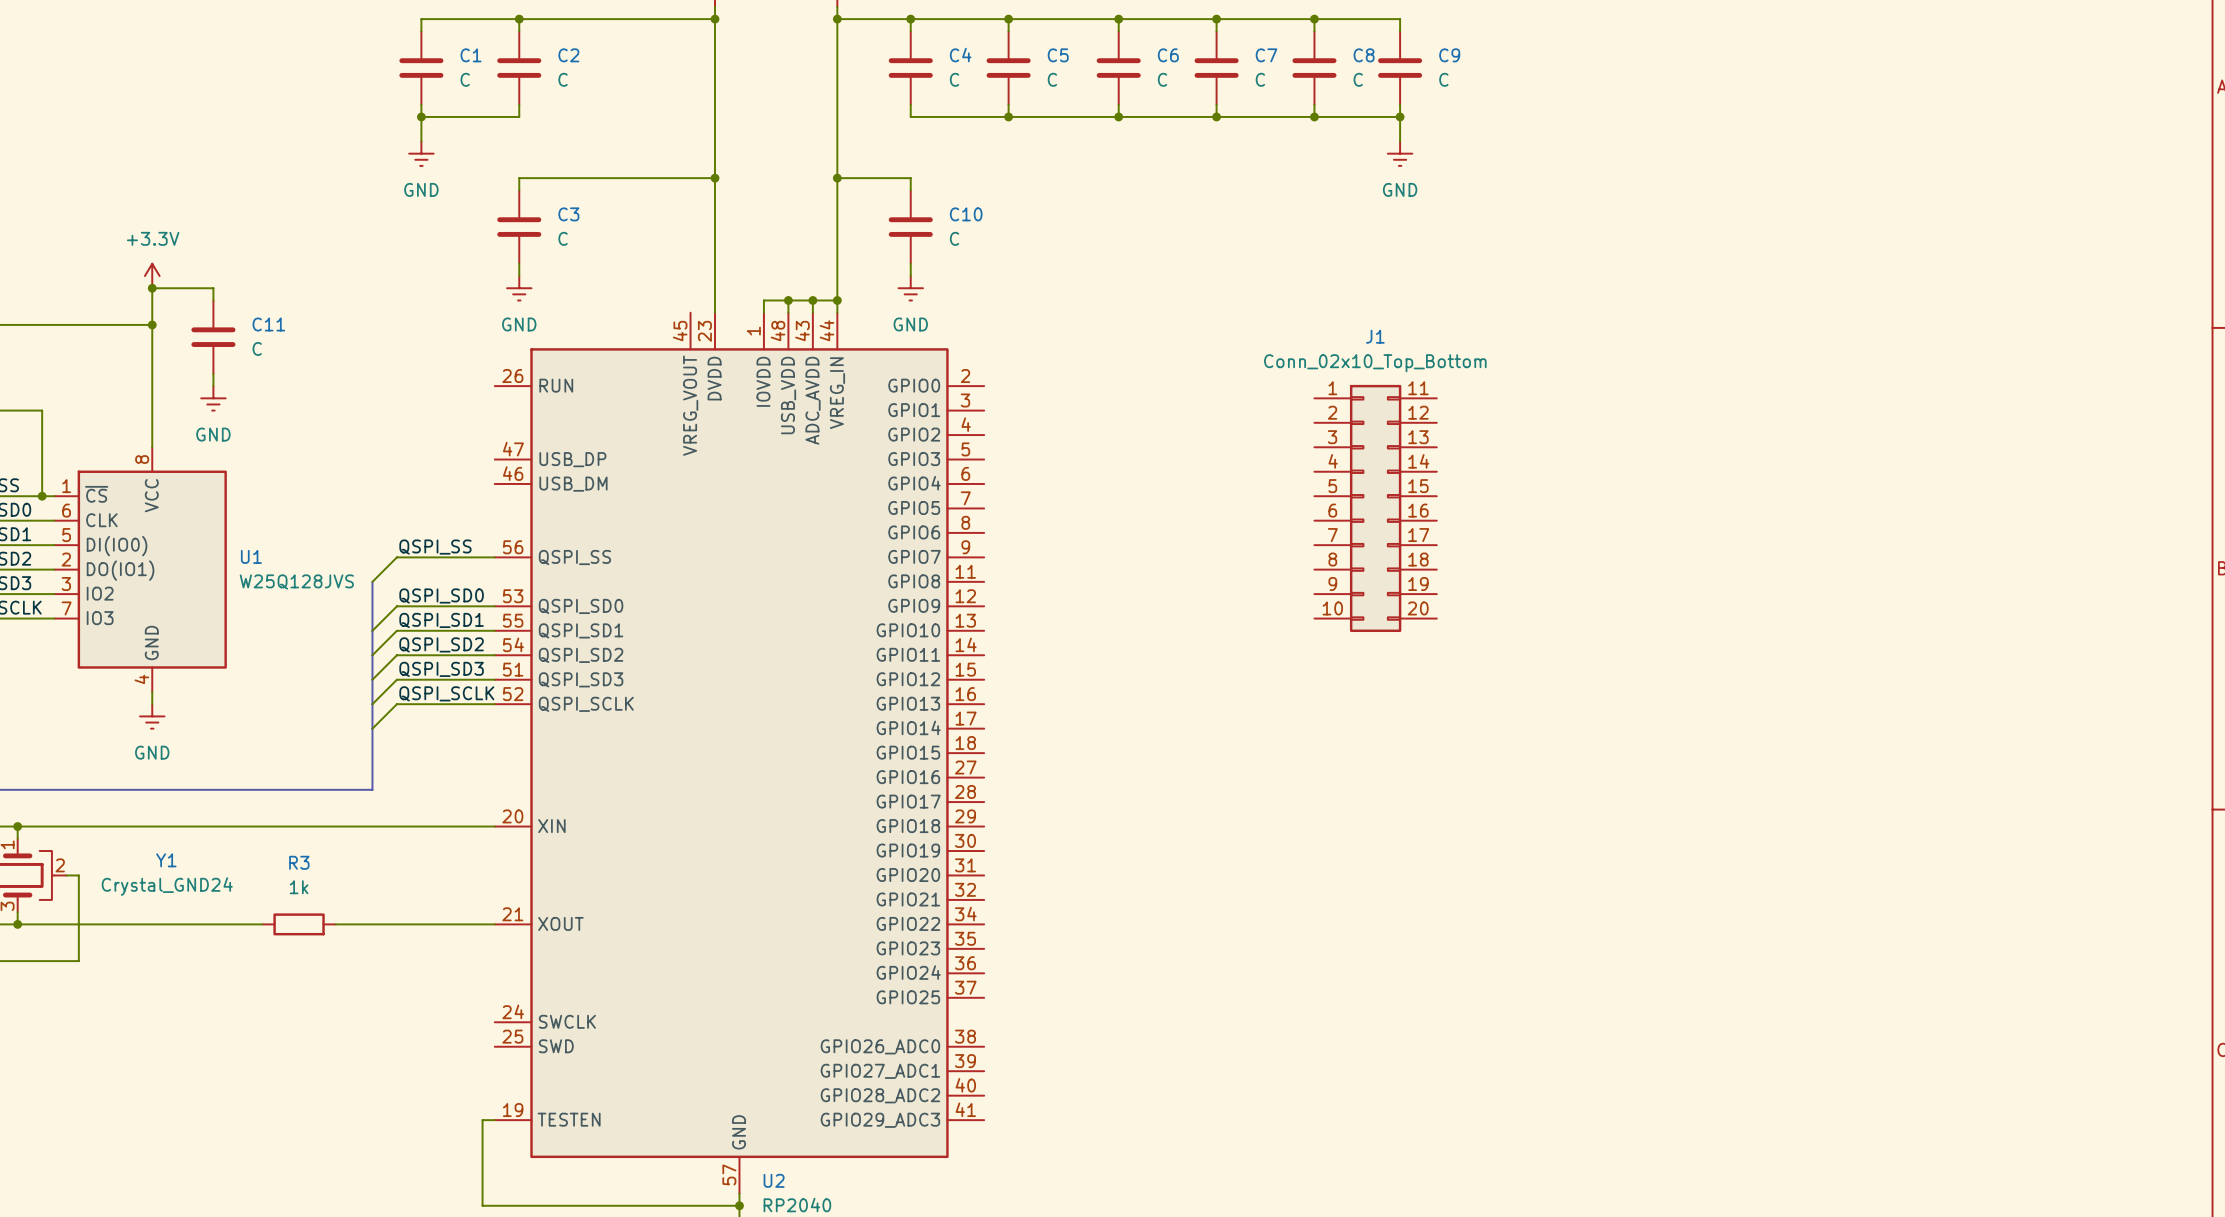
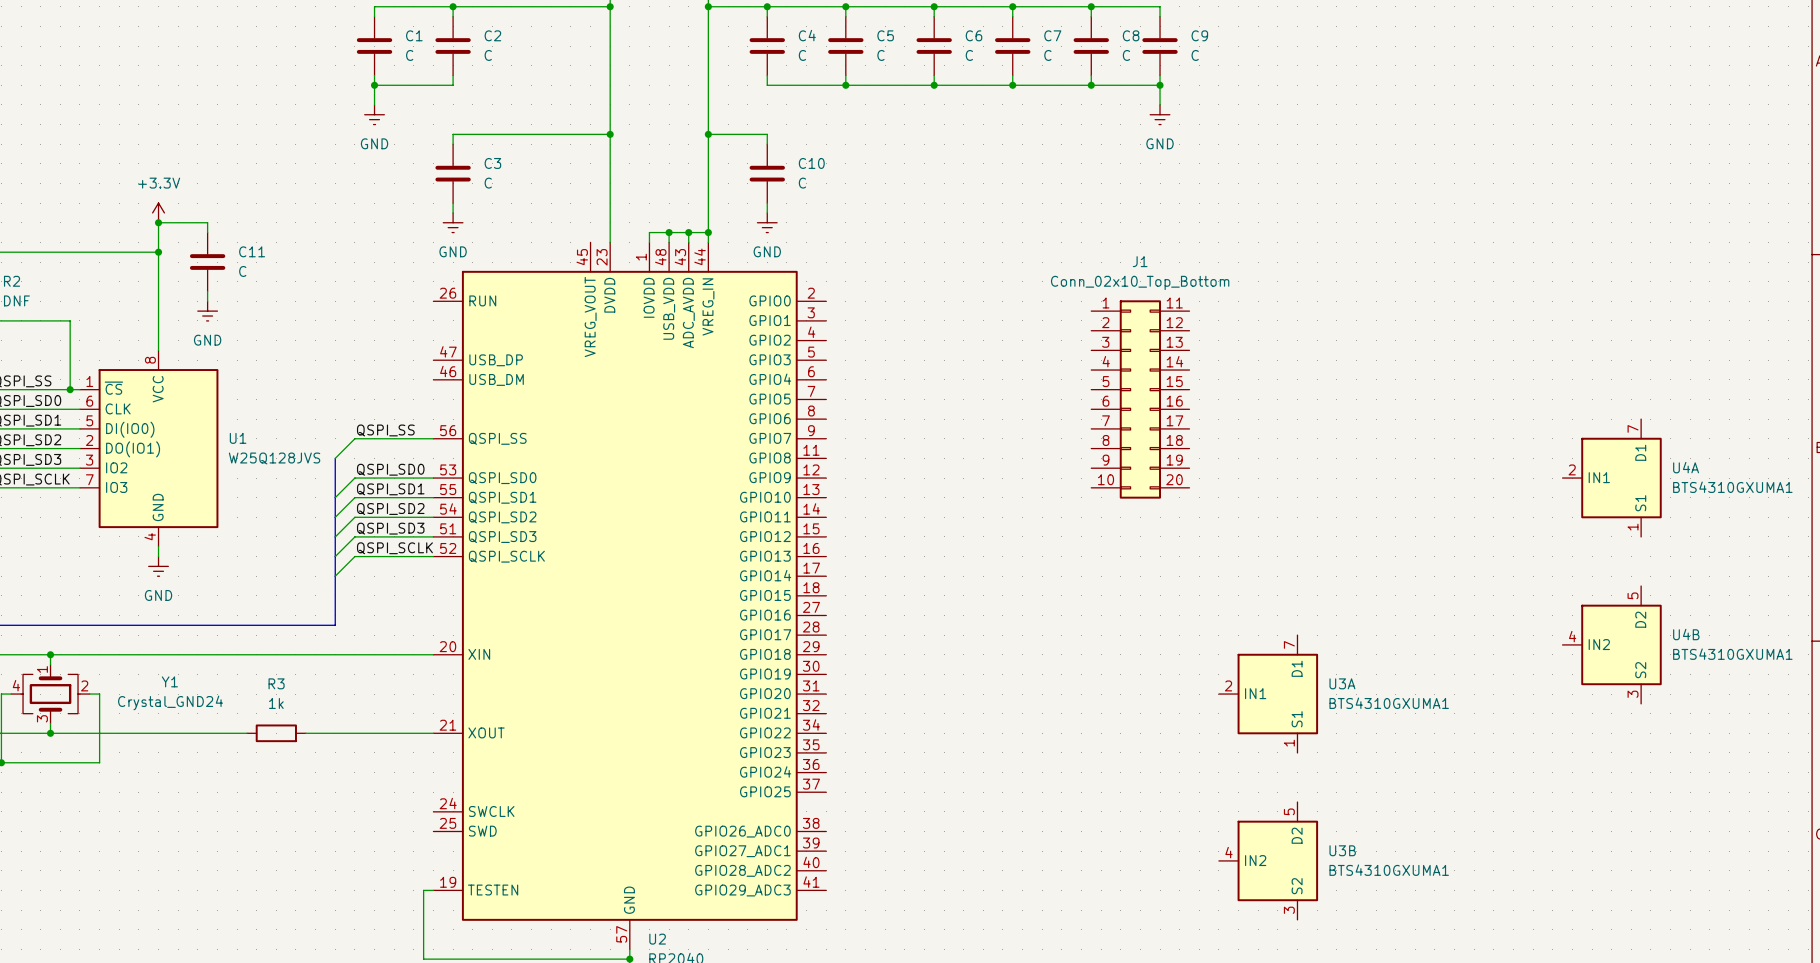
U4A: none -> BTS4310GXUMA1 (1612, 478)
U4B: none -> BTS4310GXUMA1 (1612, 644)
U3A: none -> BTS4310GXUMA1 (1268, 694)
U3B: none -> BTS4310GXUMA1 (1268, 860)

